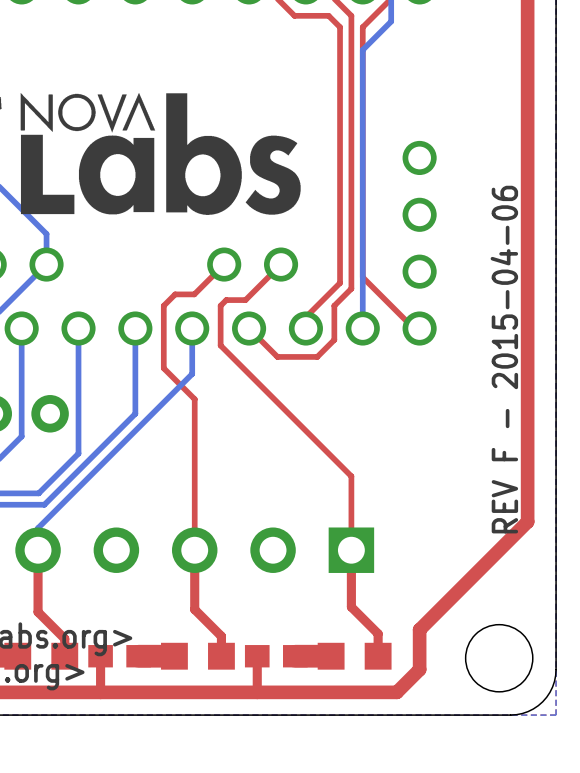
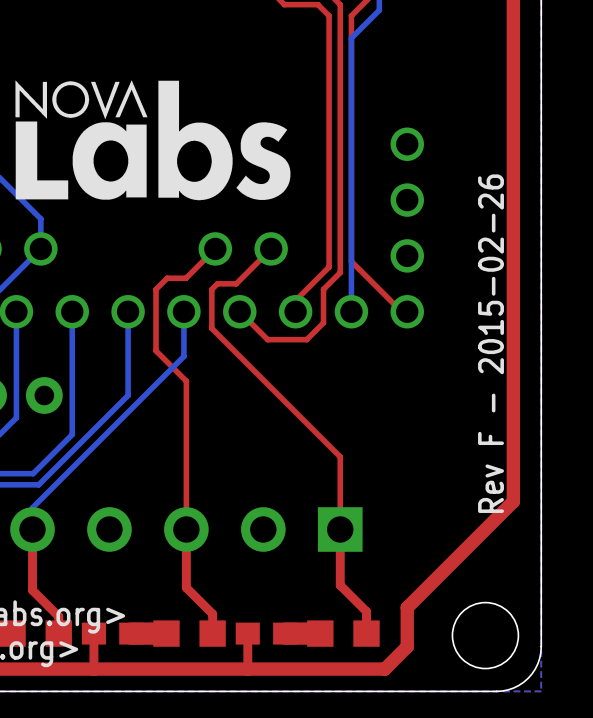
text: REV F - 2015-04-06 (504, 359) -> Rev F - 2015-02-26 (491, 343)

